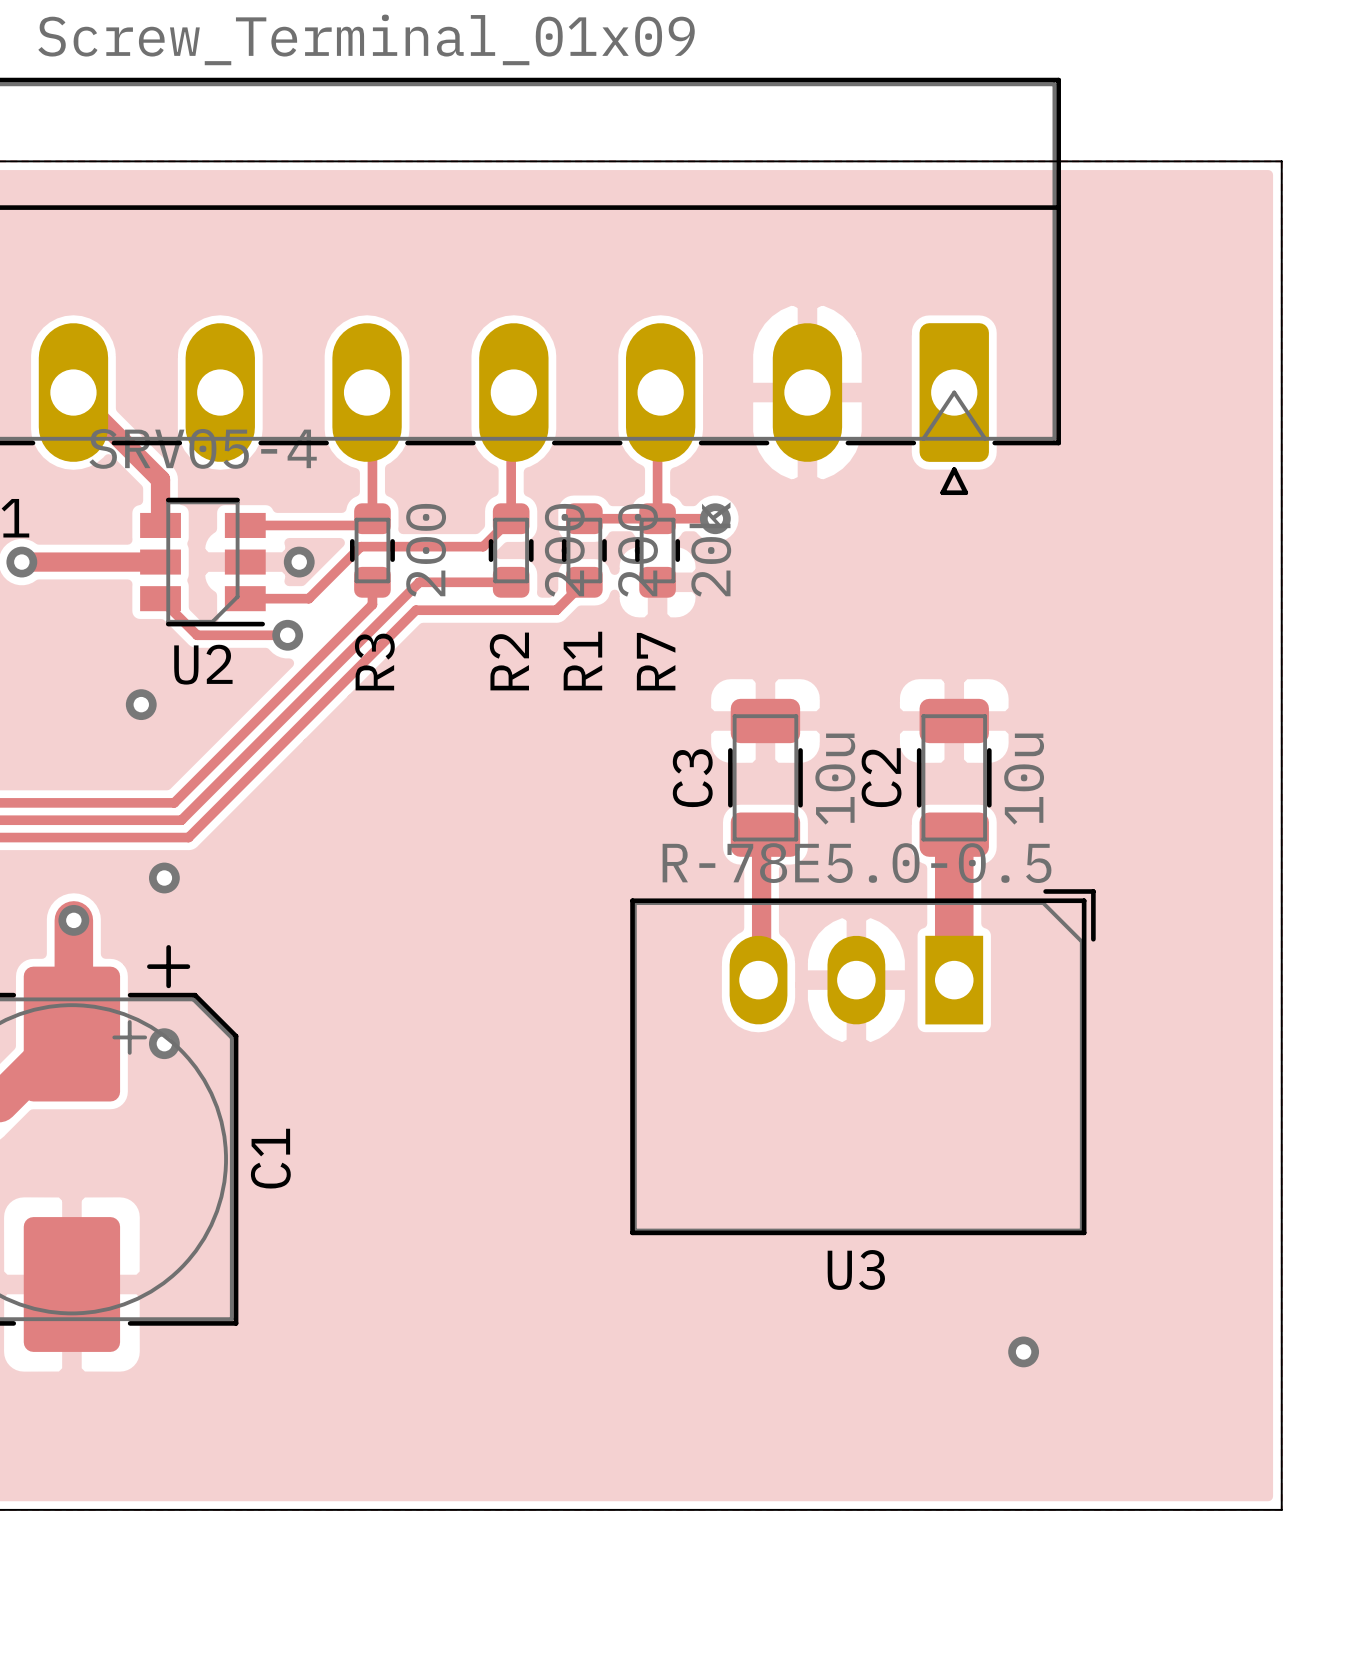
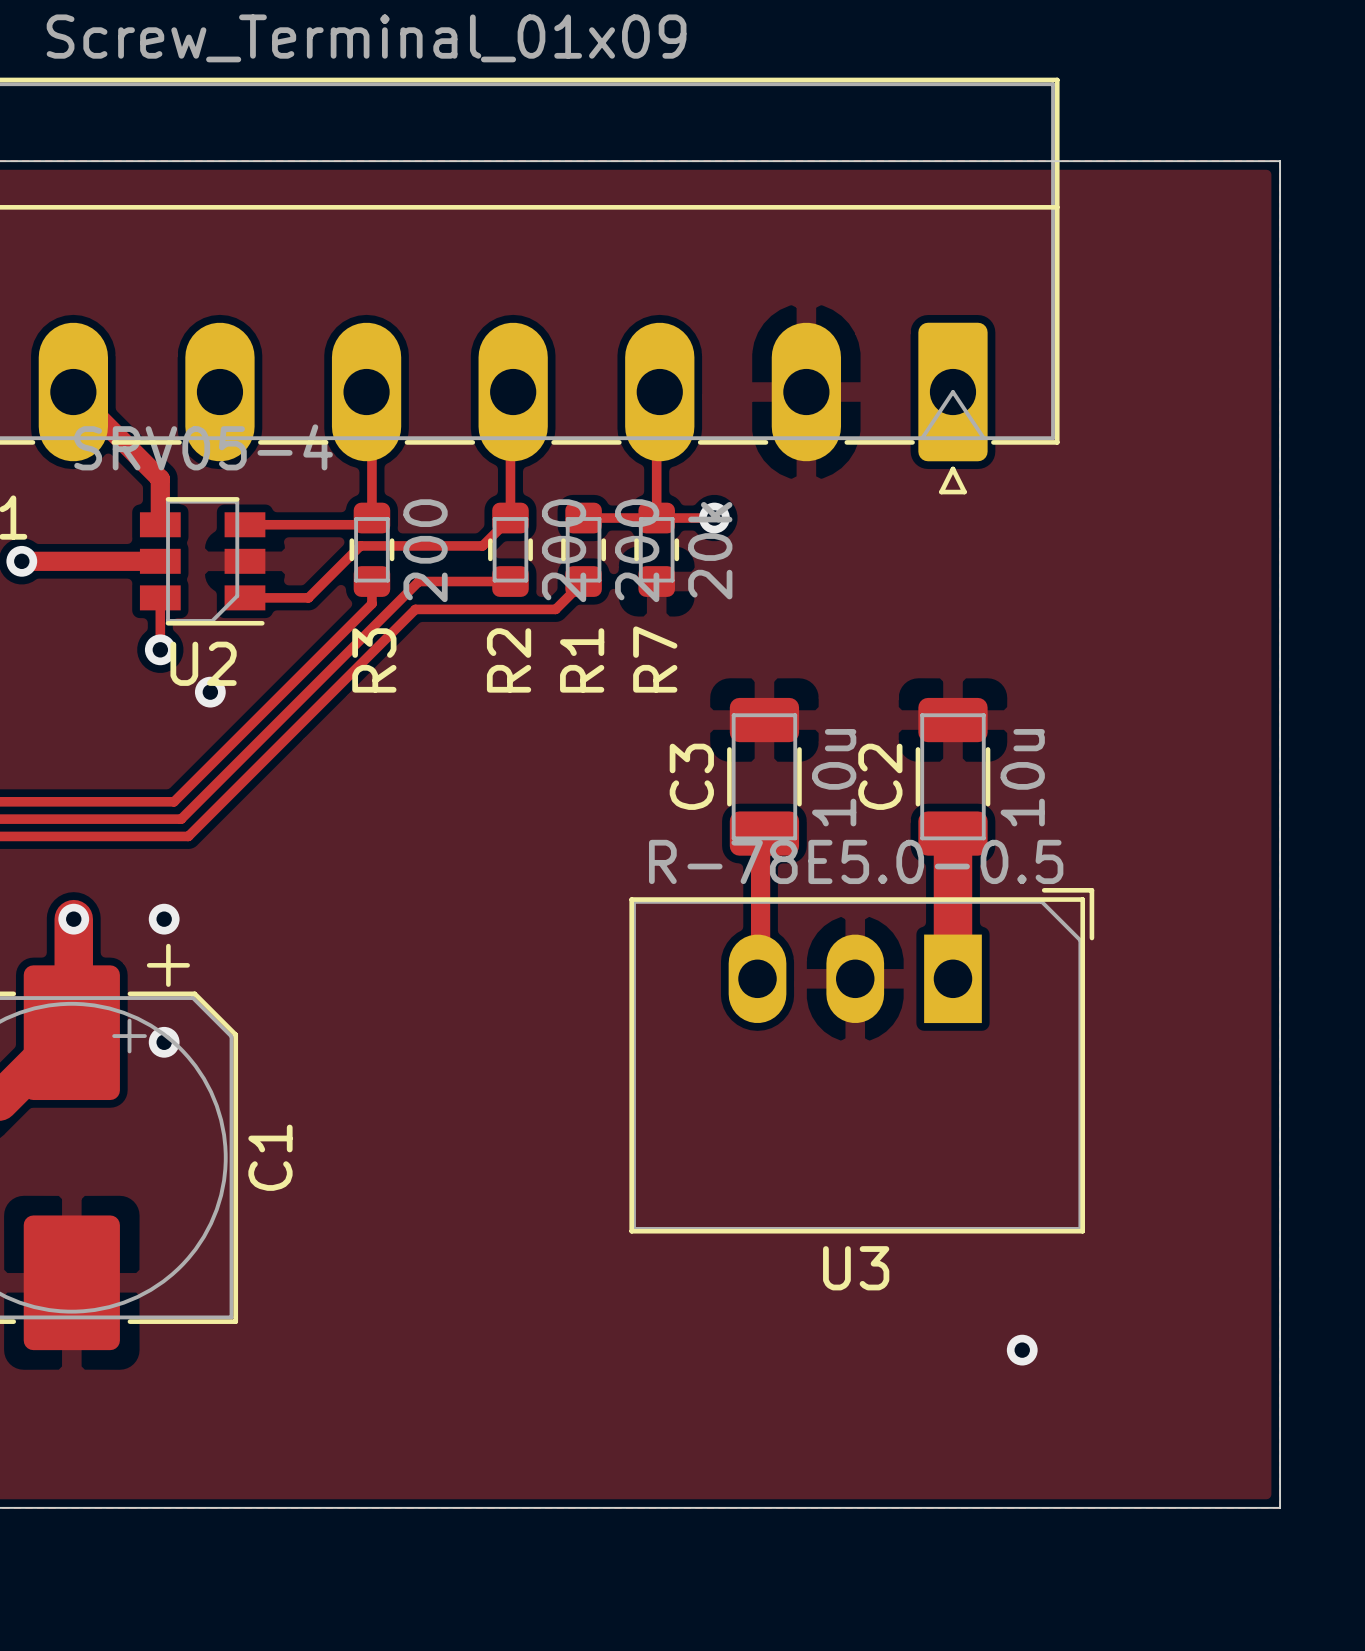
via: (299, 562) -> none
track: none -> (160, 597) (160, 649)
track: (158, 600) (160, 598) (197, 635) (287, 635) -> none
via: (287, 635) -> none
via: none -> (160, 649)
via: none -> (210, 692)
via: (141, 704) -> none
via position: (164, 878) -> (164, 919)

